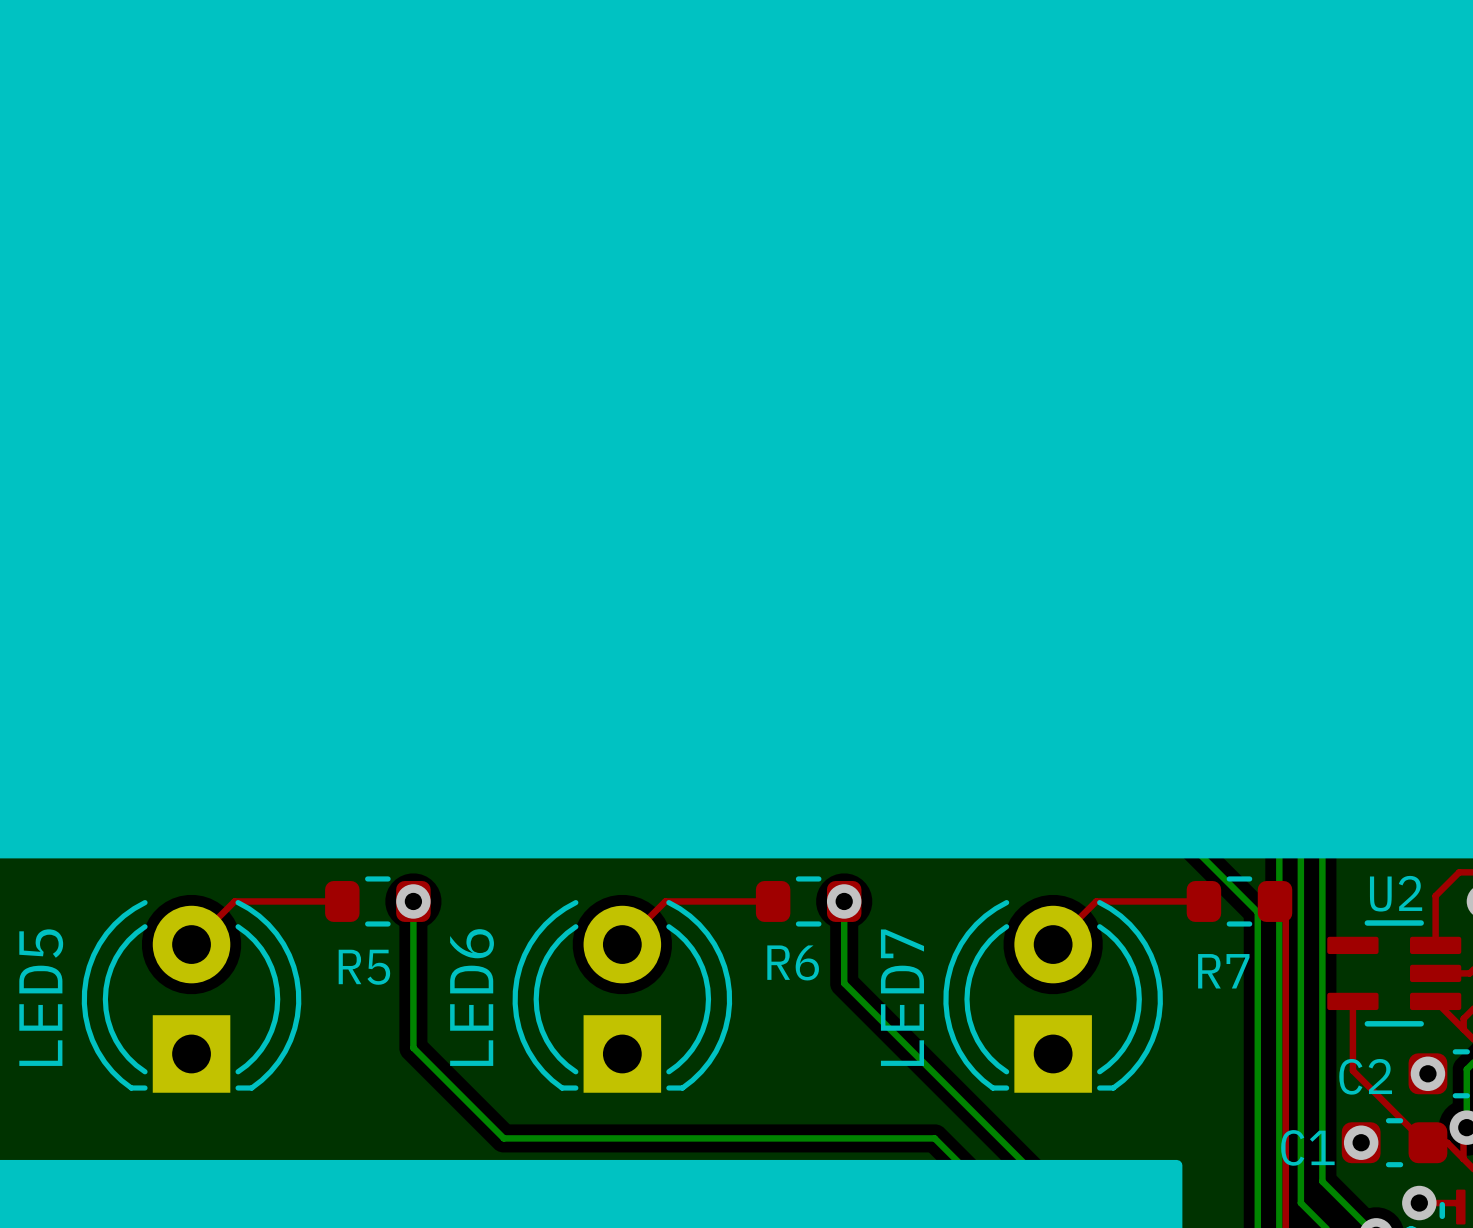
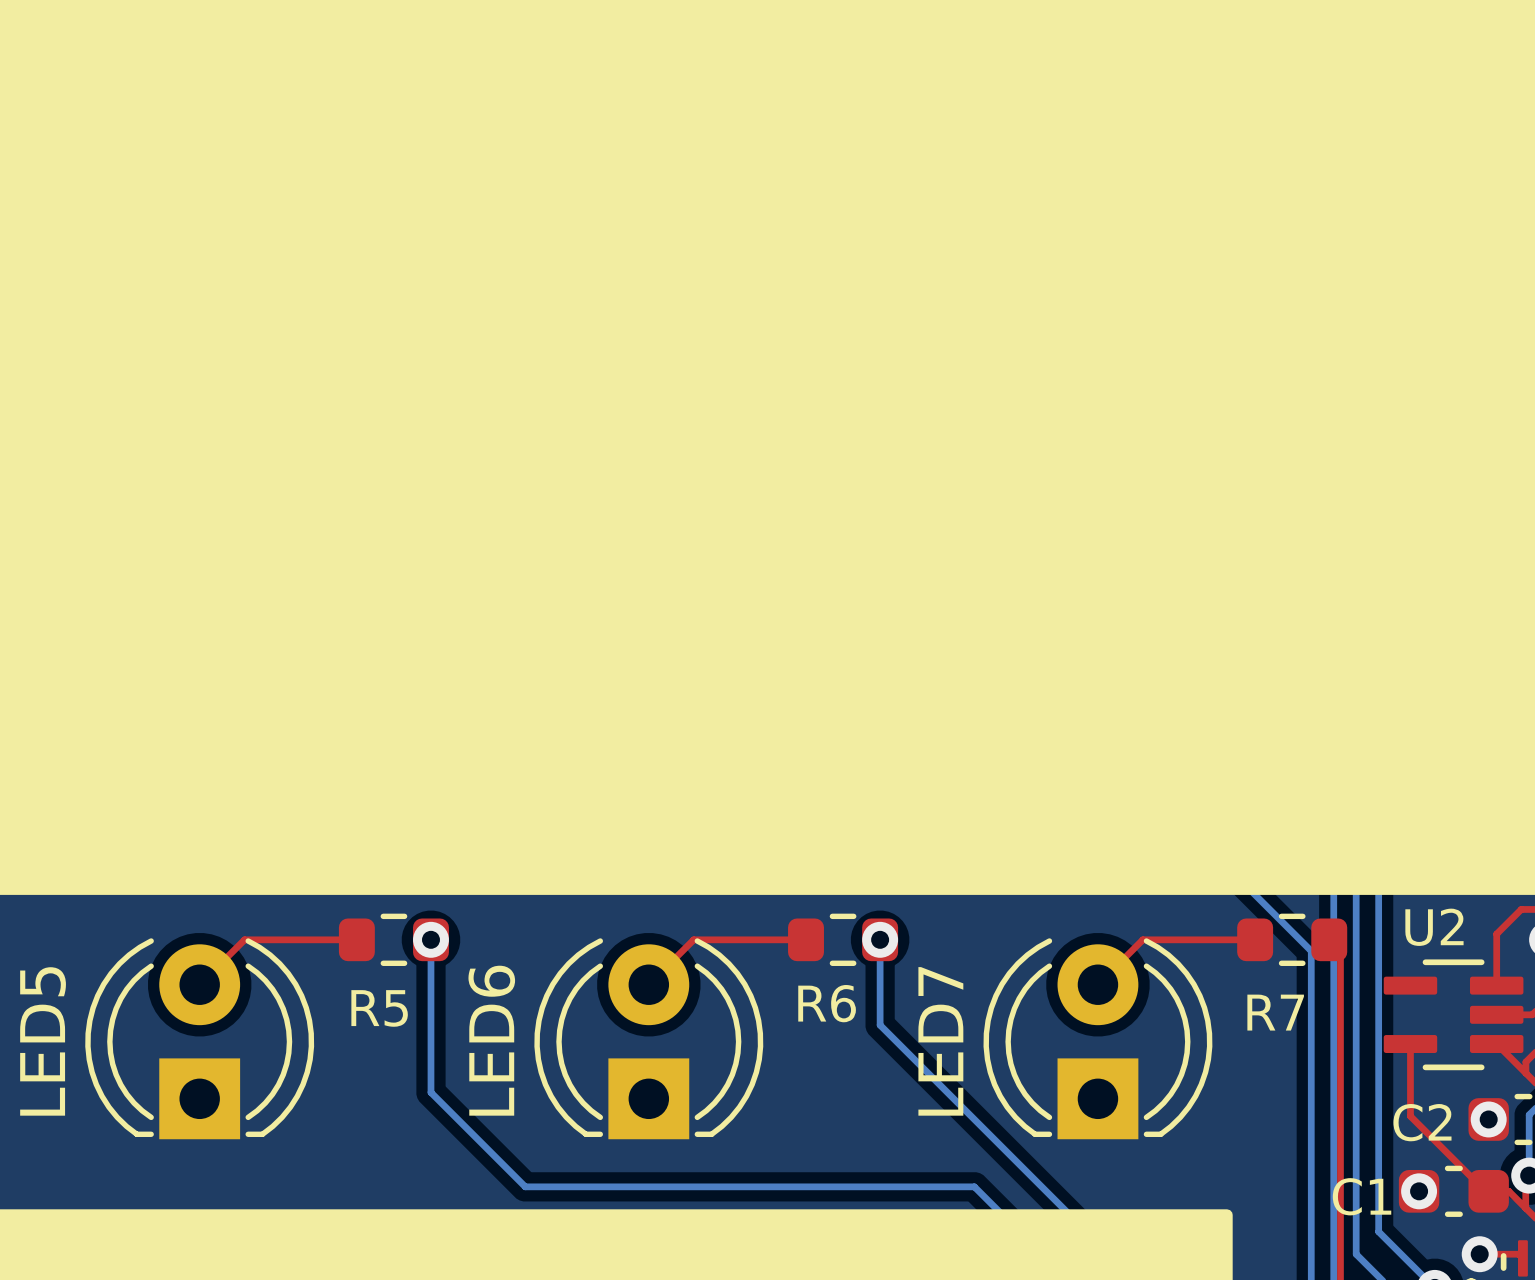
U2 name position: U2 (1396, 893) -> U2 (1434, 927)

